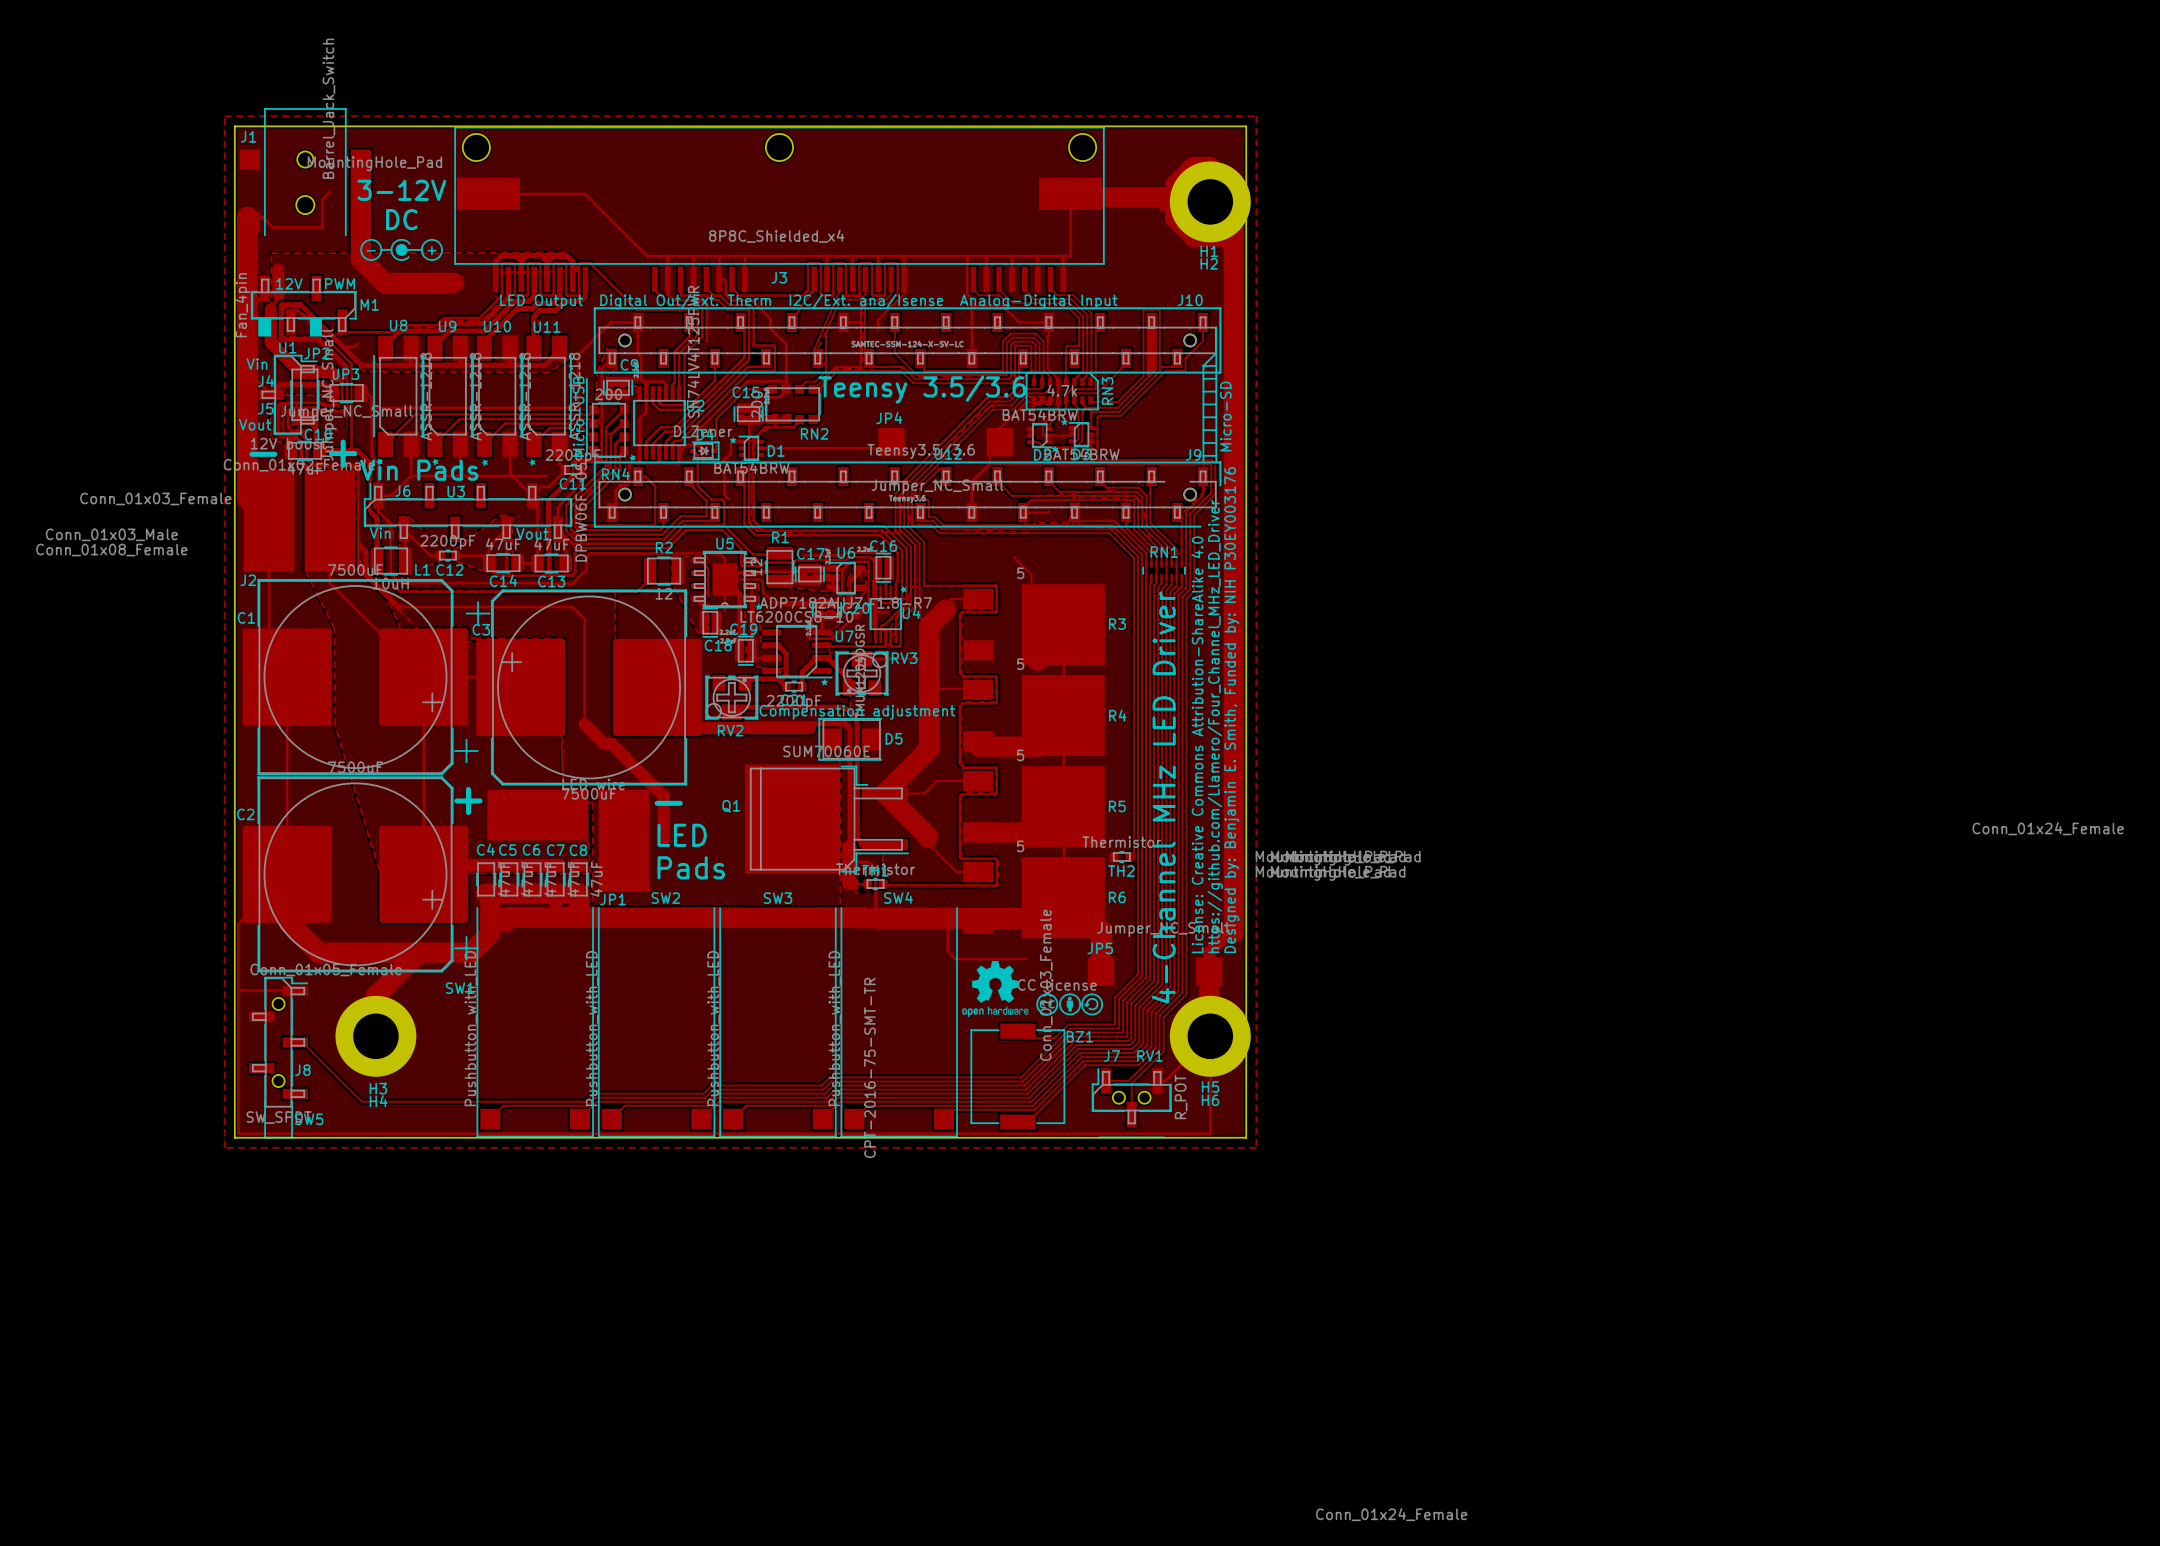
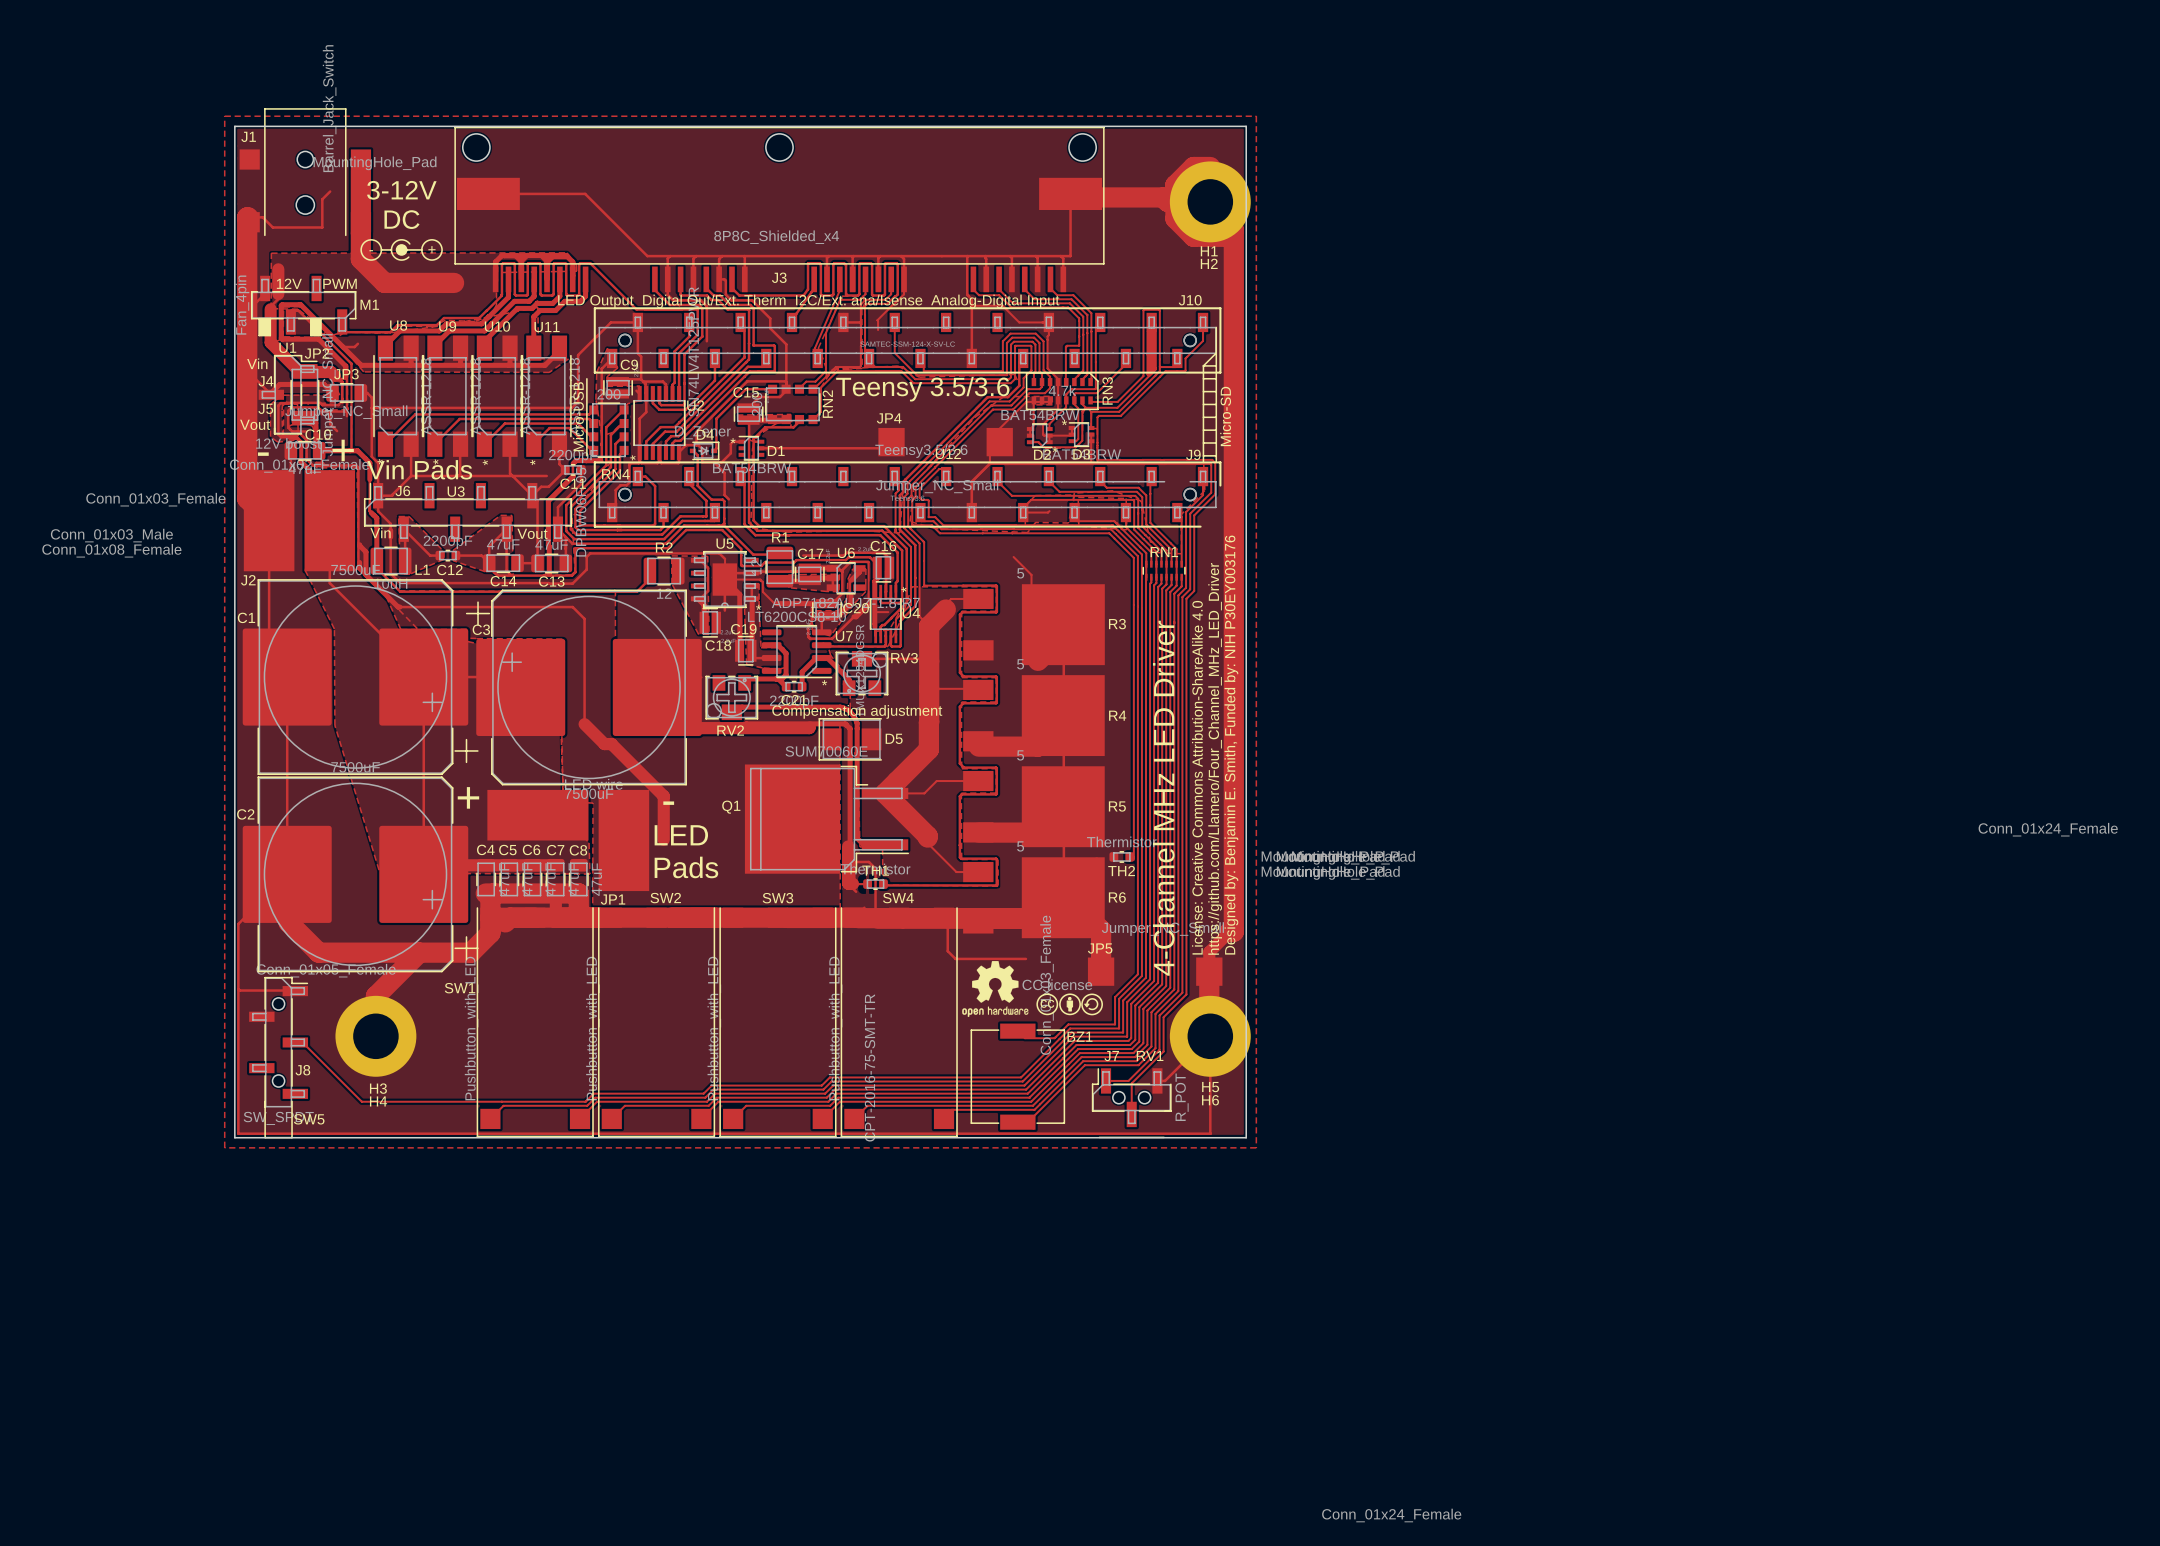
RN2 name rotation: 0° (814, 433) -> 90° counterclockwise (827, 404)

